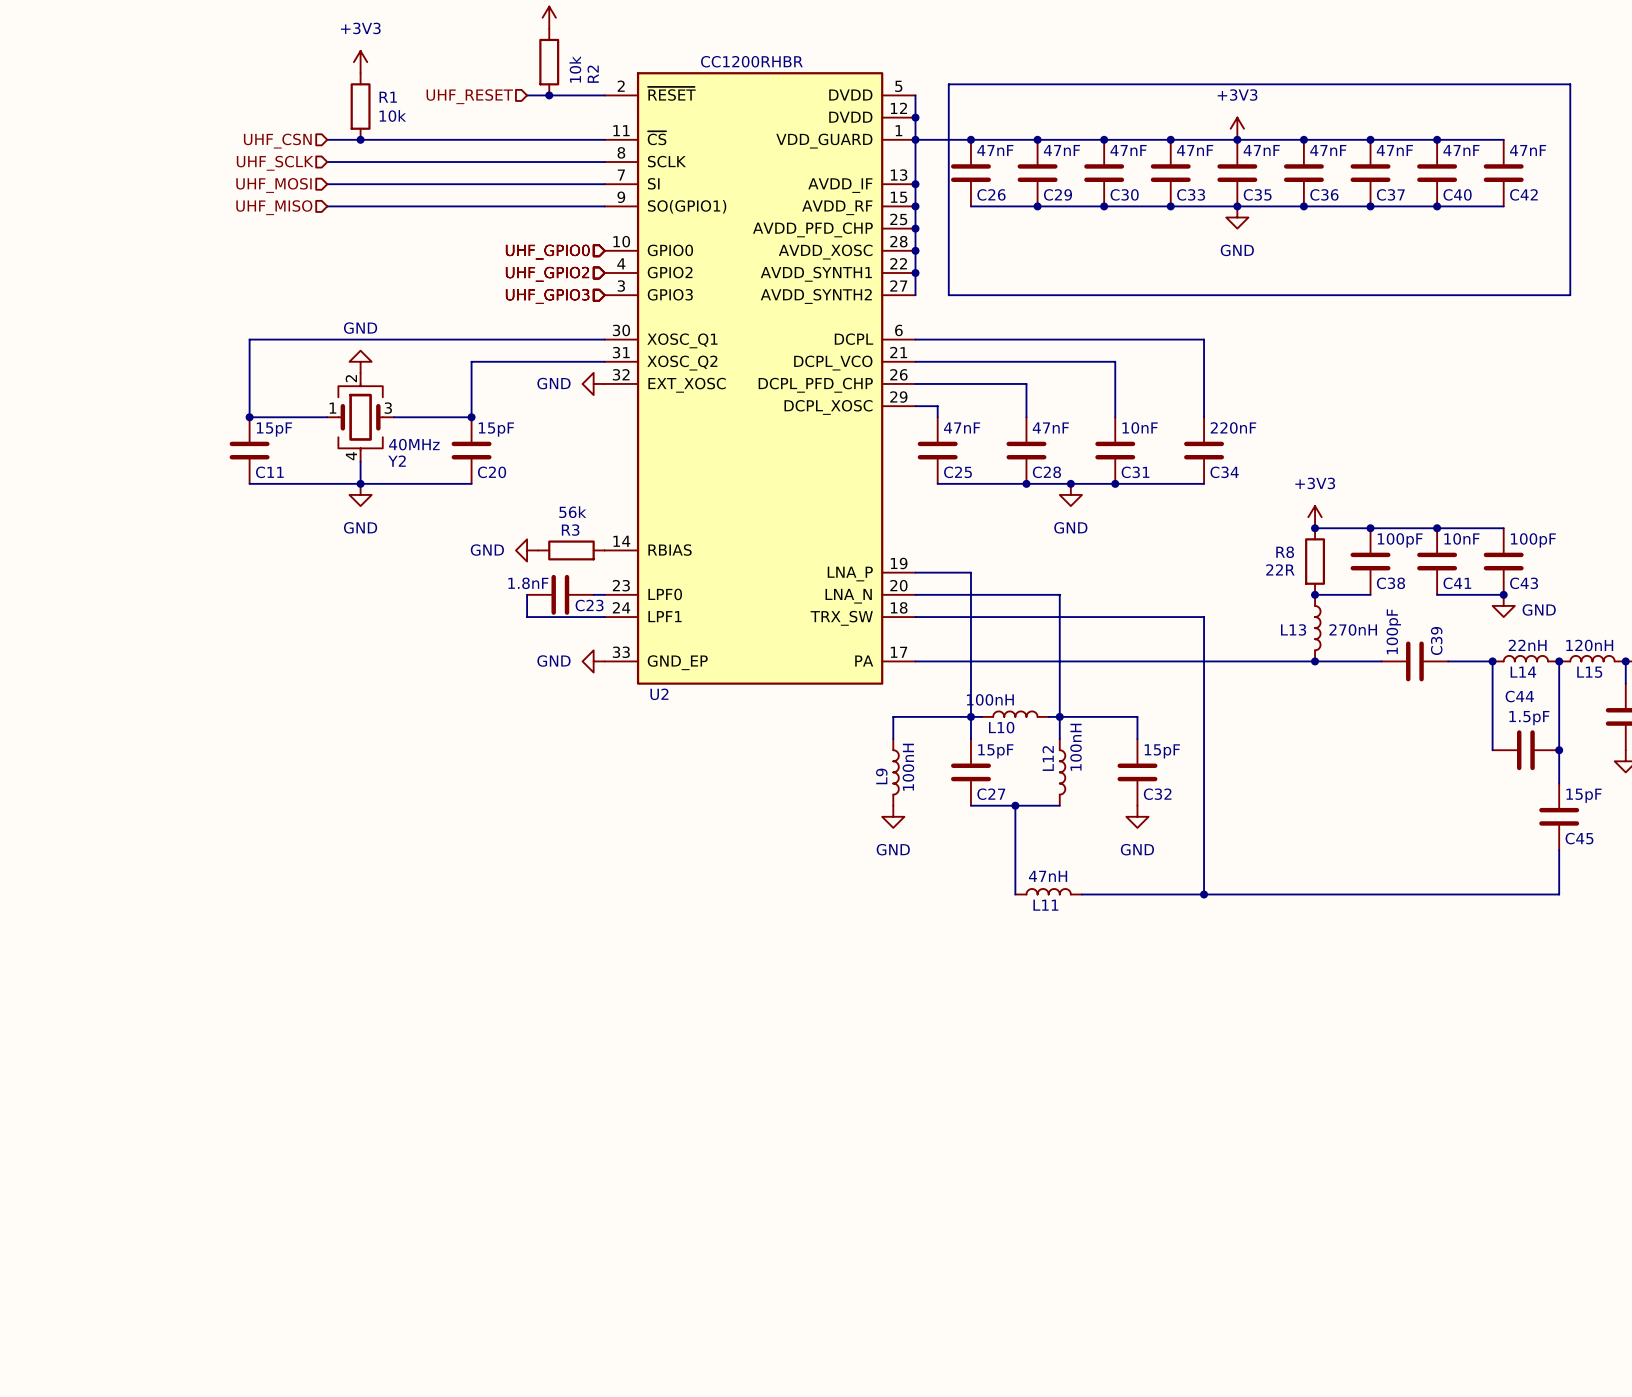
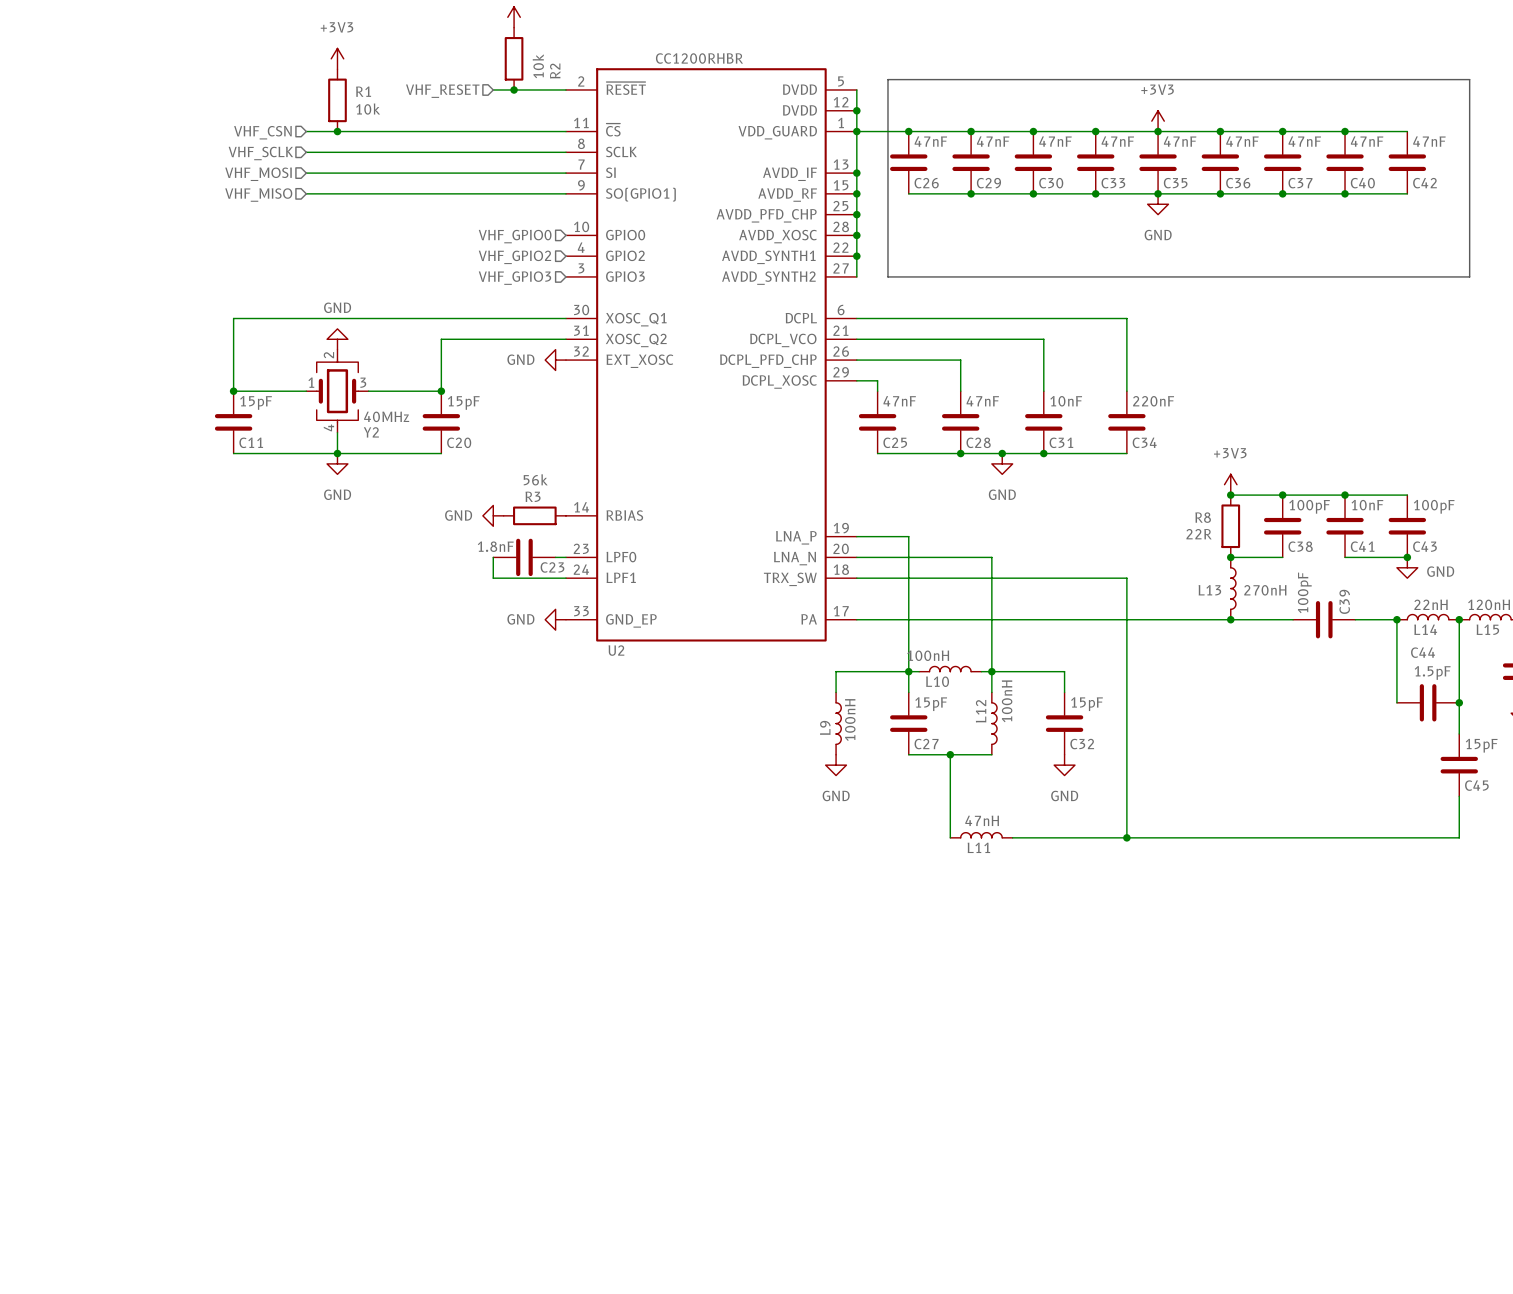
hierarchical label: UHF_RESET (469, 96) -> VHF_RESET (442, 91)
hierarchical label: UHF_CSN (277, 141) -> VHF_CSN (262, 132)
hierarchical label: UHF_SCLK (275, 163) -> VHF_SCLK (260, 153)
hierarchical label: UHF_MOSI (274, 185) -> VHF_MOSI (258, 174)
hierarchical label: UHF_MISO (274, 207) -> VHF_MISO (258, 195)
hierarchical label: UHF_GPIO0 (547, 252) -> VHF_GPIO0 (515, 236)
hierarchical label: UHF_GPIO2 (547, 274) -> VHF_GPIO2 (514, 257)
hierarchical label: UHF_GPIO3 (547, 296) -> VHF_GPIO3 (514, 278)

